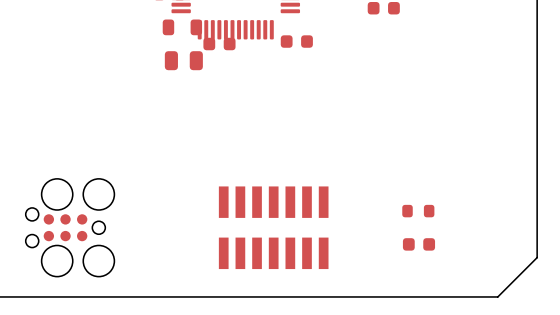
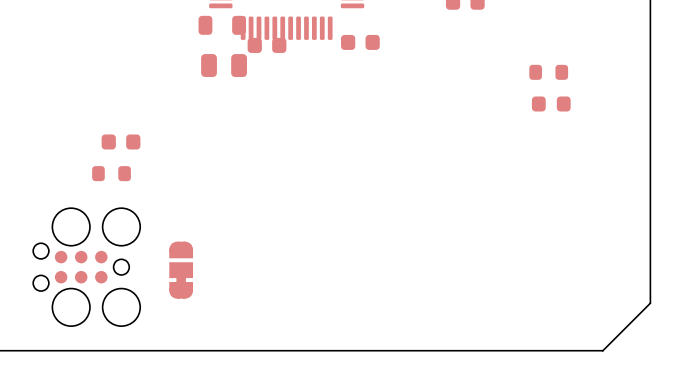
part: none -> (551, 103)
part: none -> (121, 141)
part: none -> (111, 173)
part position: (418, 211) -> (548, 72)
part: (273, 227) -> none
part: none -> (181, 270)
part: (418, 244) -> none

